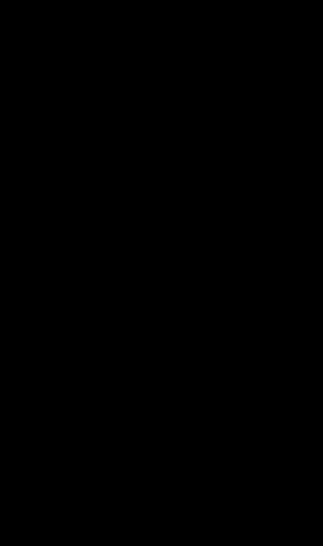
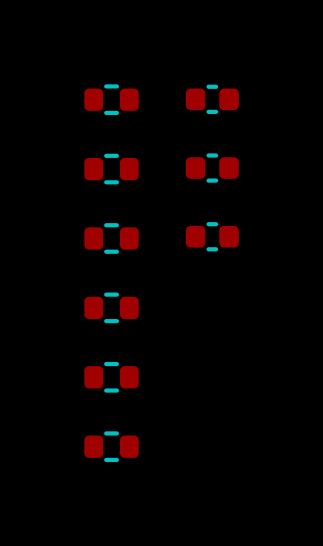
part: none -> (111, 99)
part: none -> (212, 99)
part: none -> (212, 168)
part: none -> (111, 169)
part: none -> (212, 236)
part: none -> (111, 238)
part: none -> (111, 307)
part: none -> (111, 377)
part: none -> (111, 446)

